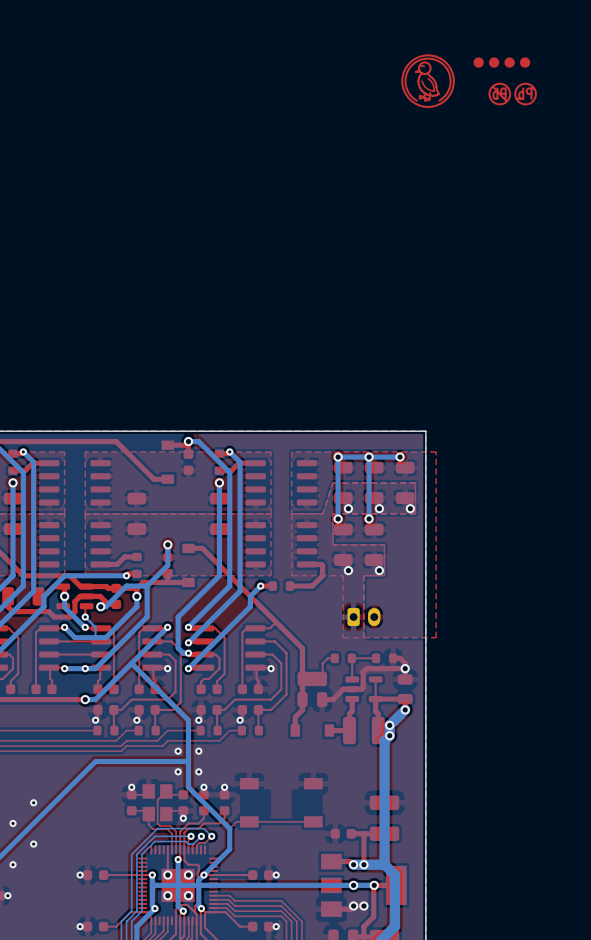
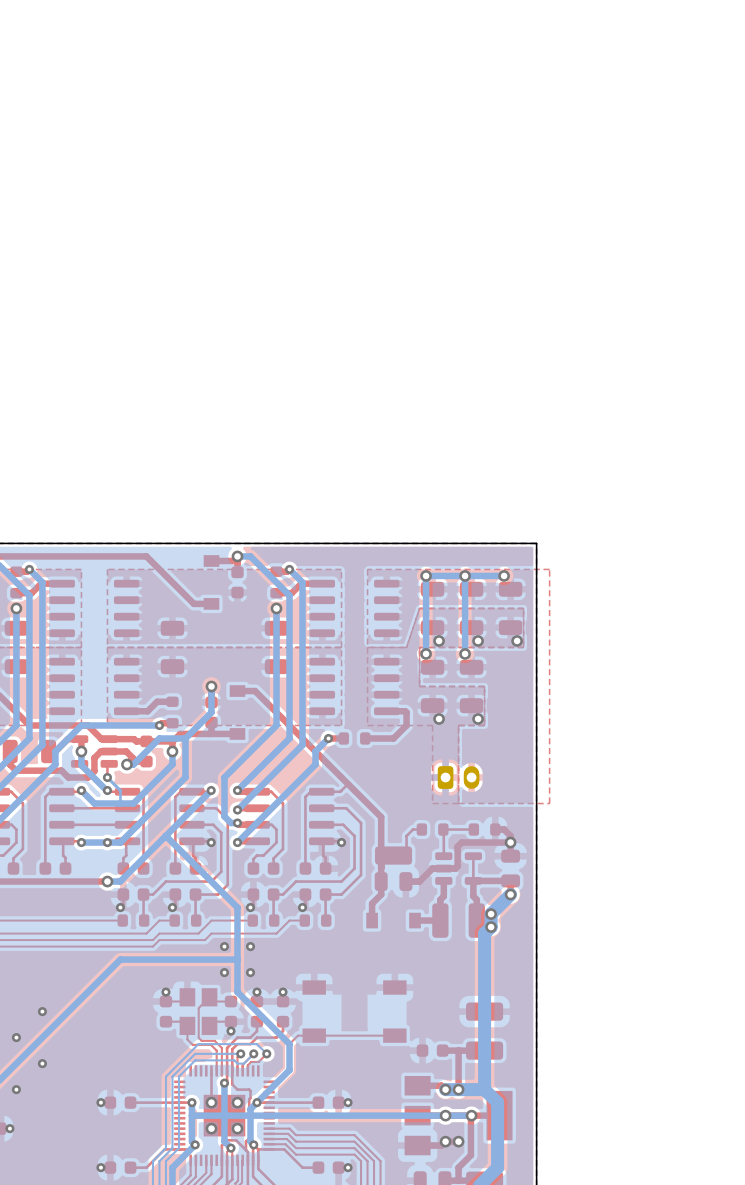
drawing: [401, 54, 455, 108] -> none
drawing: [473, 57, 531, 68] -> none
drawing: [488, 82, 537, 106] -> none

